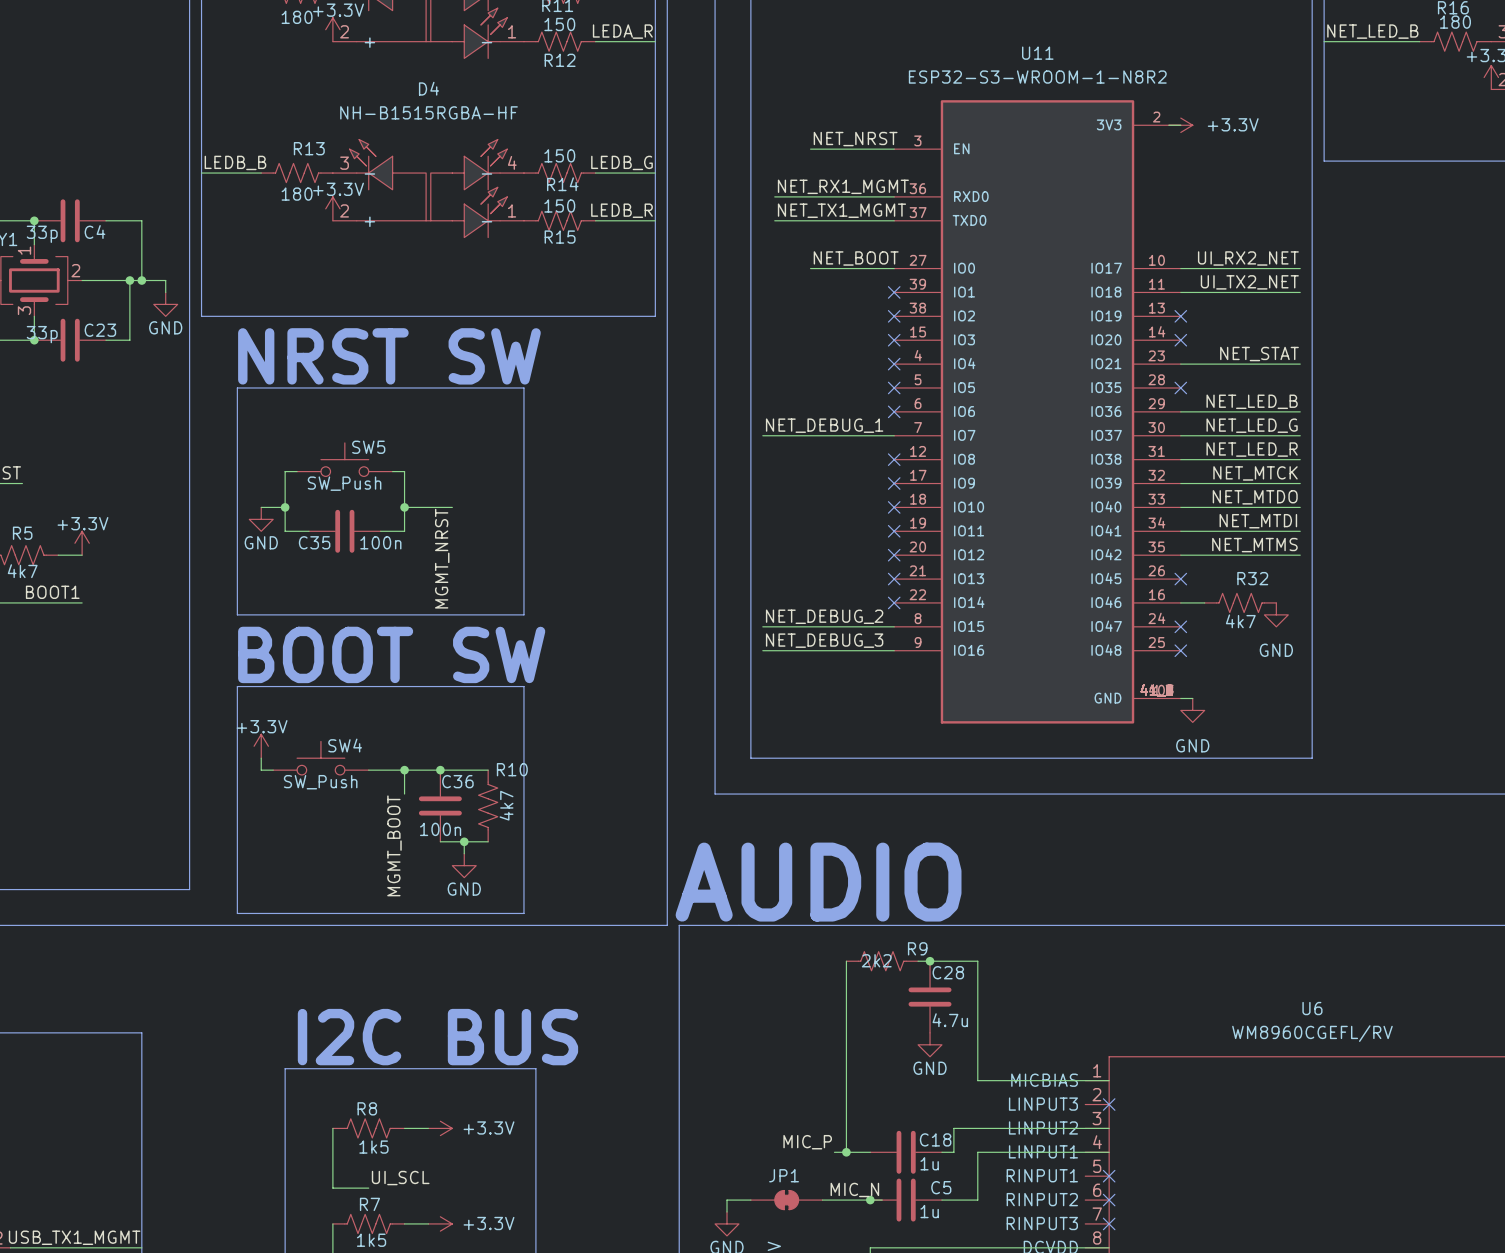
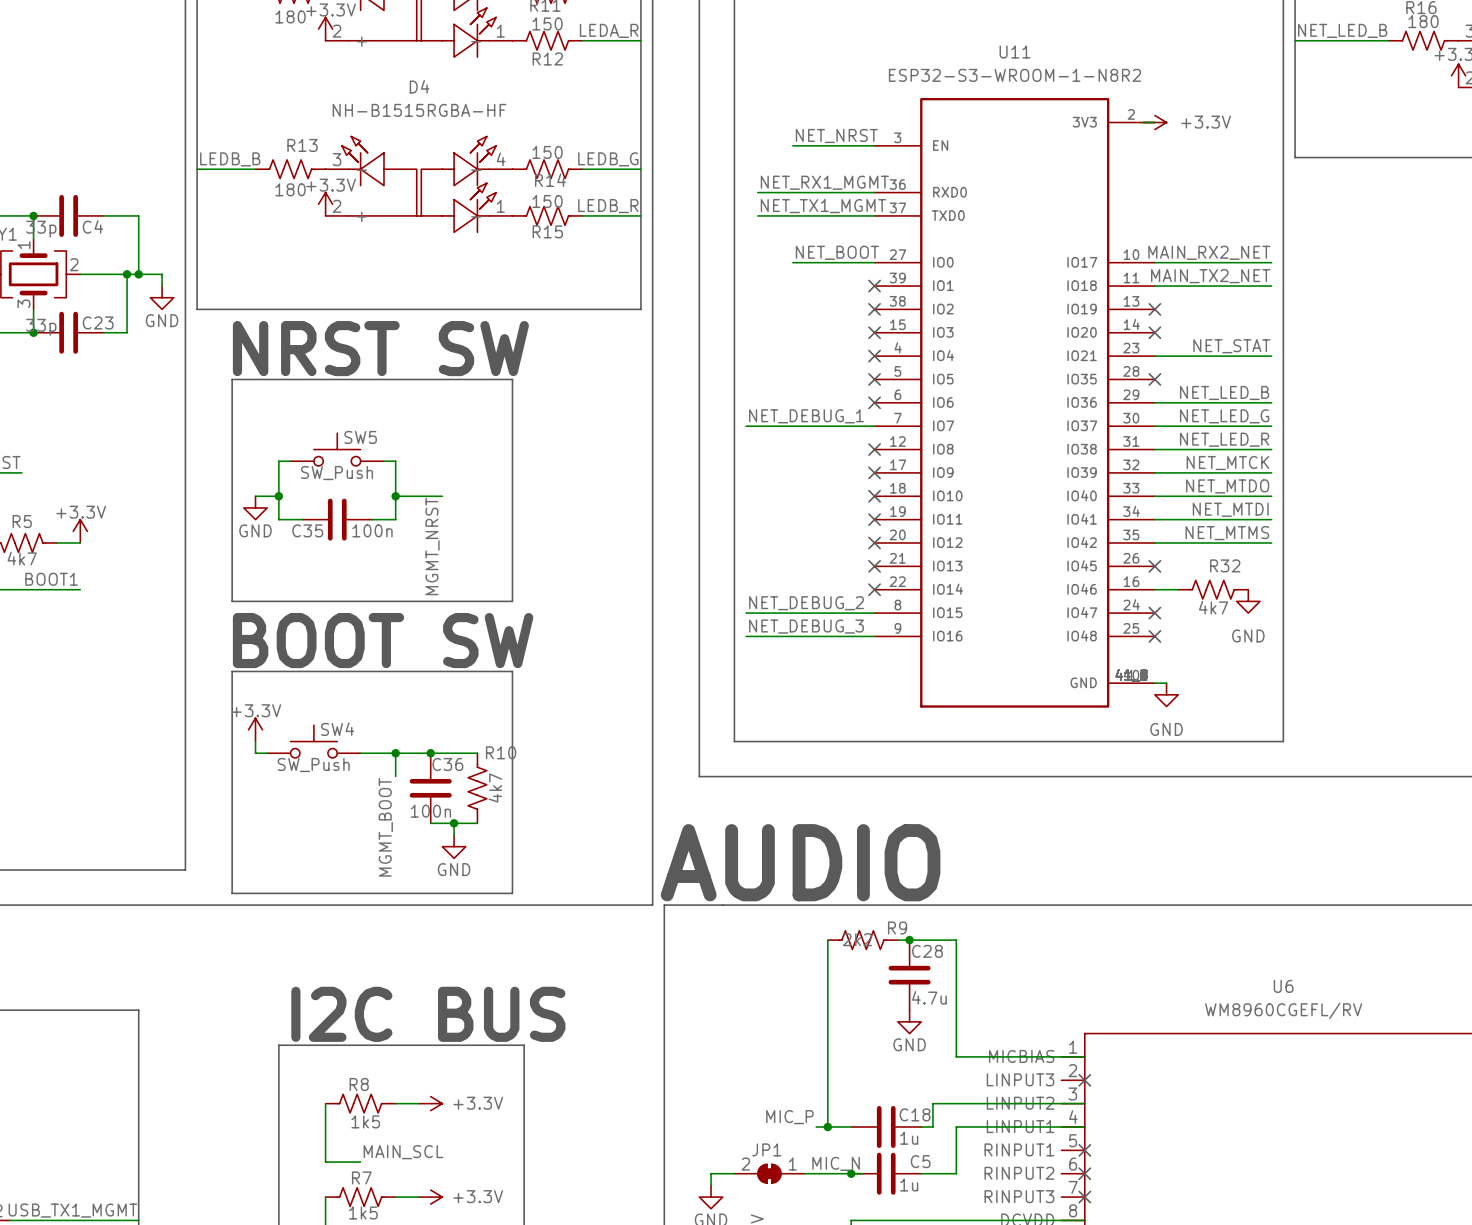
label: UI_RX2_NET (1248, 258) -> MAIN_RX2_NET (1209, 252)
label: UI_TX2_NET (1249, 282) -> MAIN_TX2_NET (1210, 276)
label: UI_SCL (400, 1178) -> MAIN_SCL (403, 1152)
JP1 pin number: none -> 2 (745, 1164)
JP1 pin number: none -> 1 (792, 1164)

